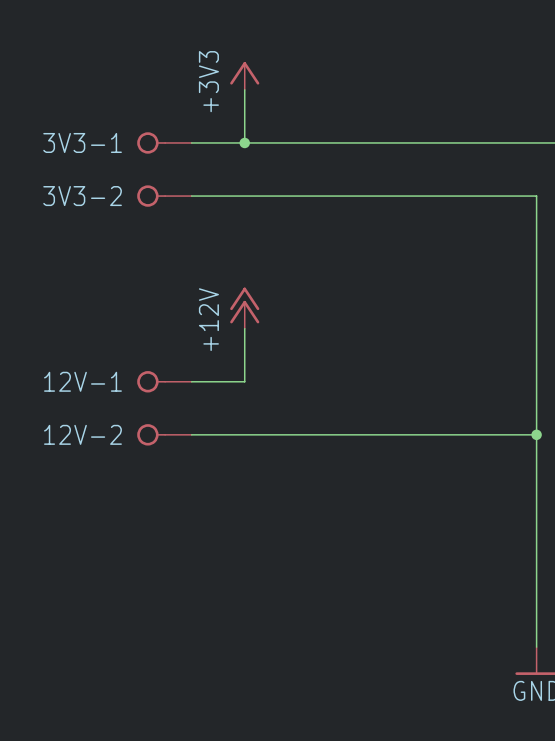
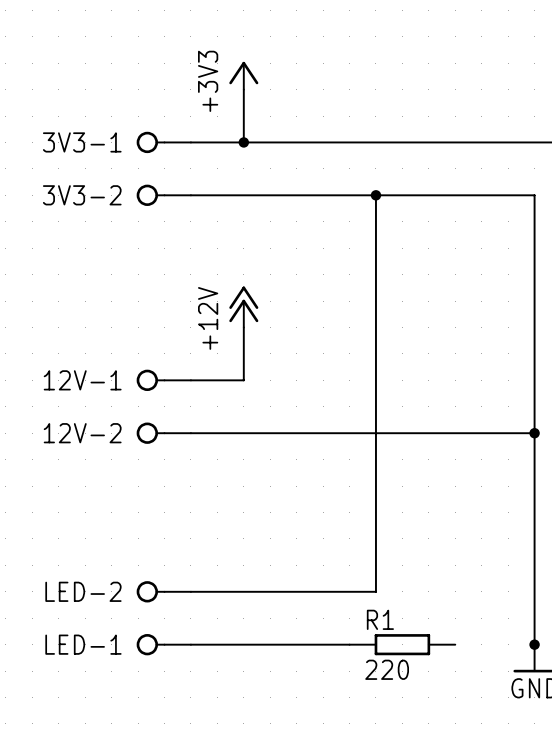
wire: none -> (375, 195) (375, 591) (190, 591)
junction: none -> (375, 195)
LED-2: none -> (163, 591)
LED-1: none -> (163, 644)
wire: none -> (190, 644) (349, 644)
R1: none -> 220 (402, 644)
junction: none -> (534, 644)

